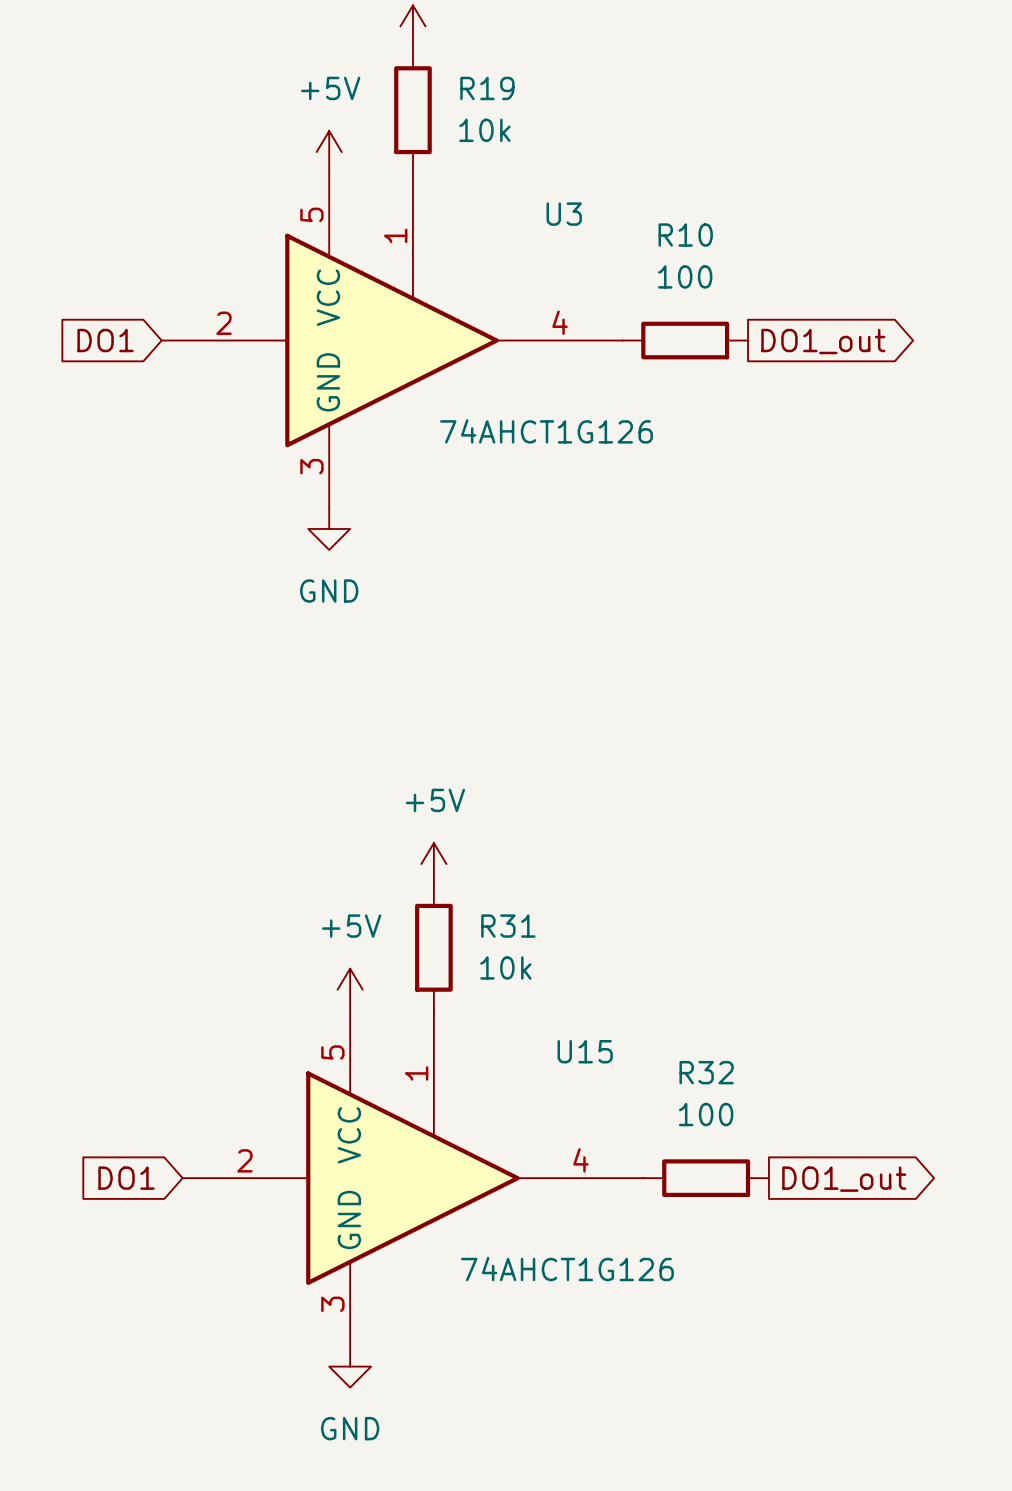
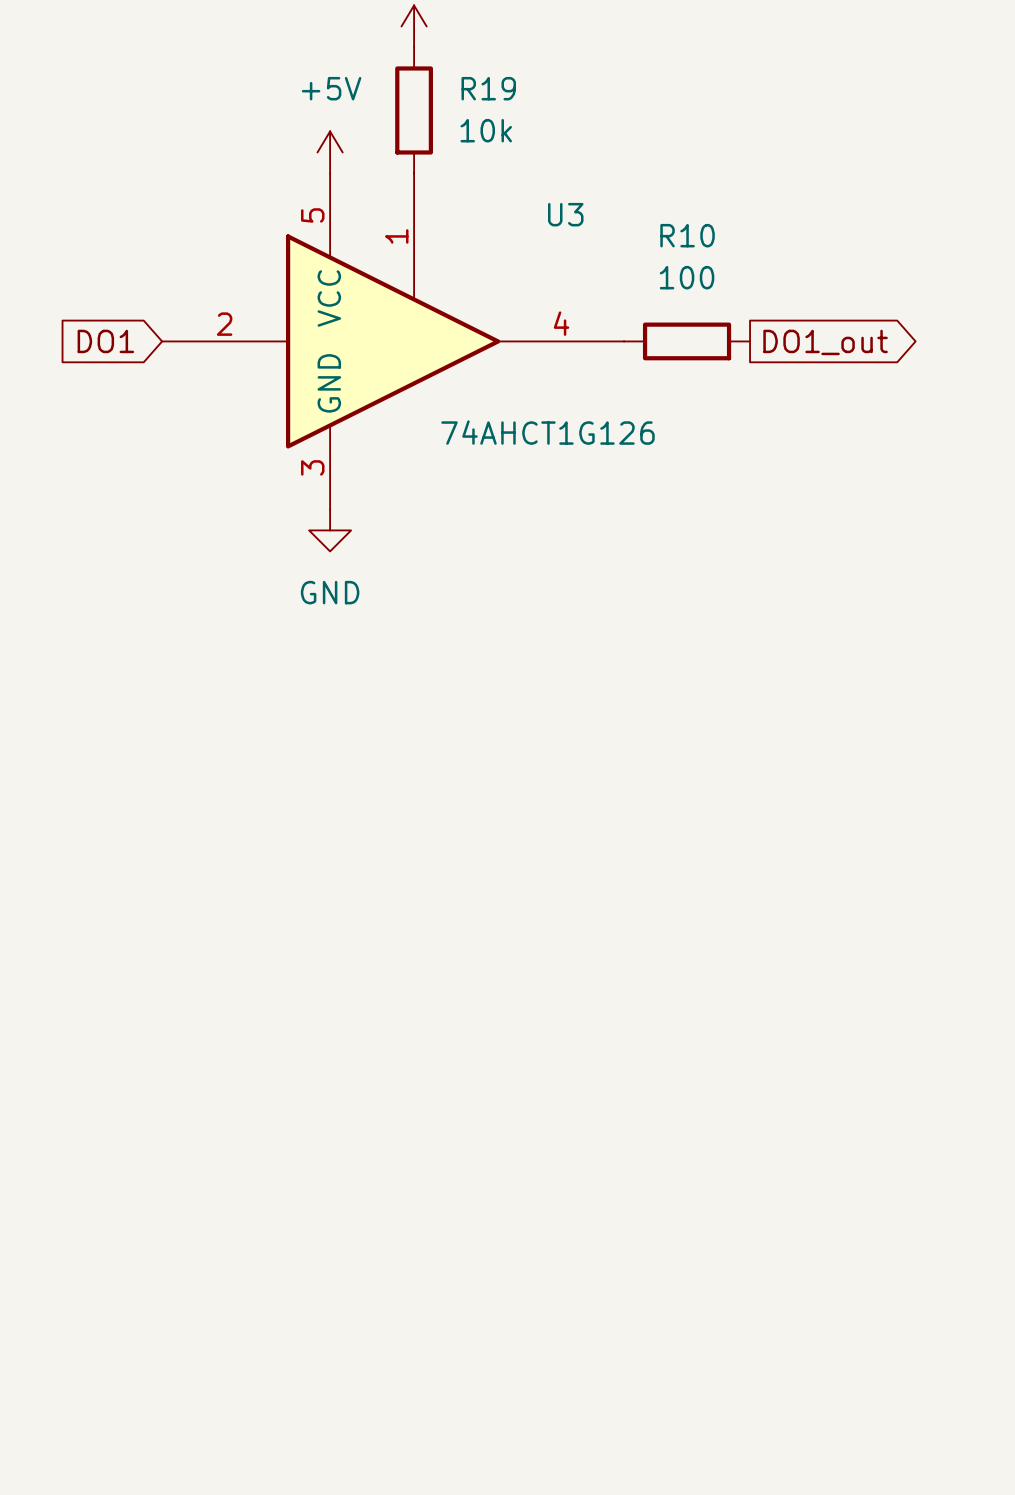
power symbol: +5V (433, 864) -> none
R31: 10k (433, 947) -> none
power symbol: +5V (350, 989) -> none
global label: DO1 (126, 1178) -> none
U15: 74AHCT1G126 (412, 1178) -> none
R32: 100 (706, 1178) -> none
global label: DO1_out (844, 1179) -> none
power symbol: GND (350, 1366) -> none

